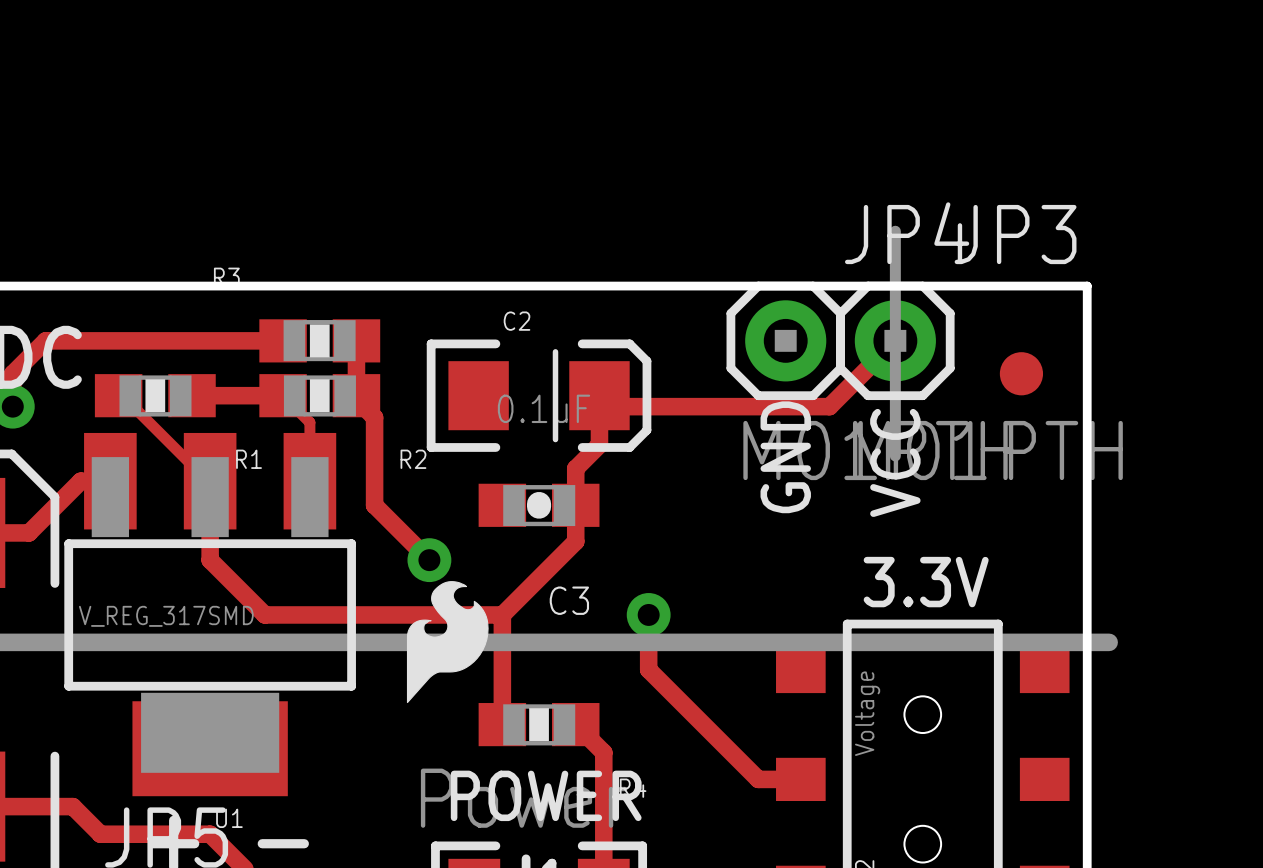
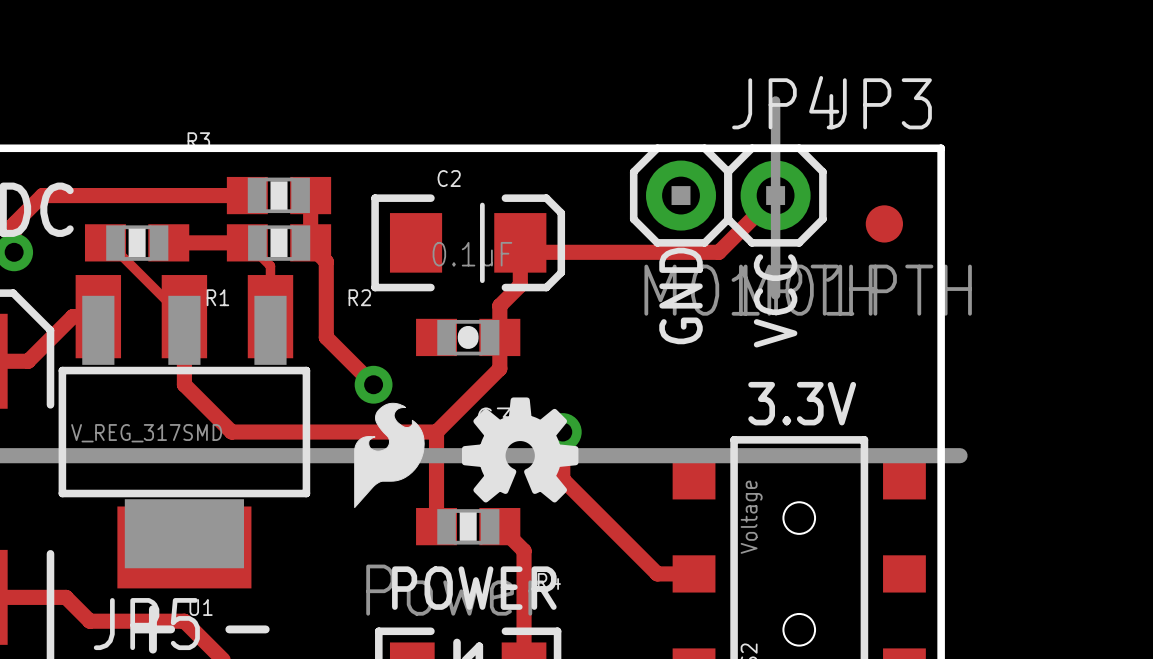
drawing: none -> [461, 397, 579, 503]

